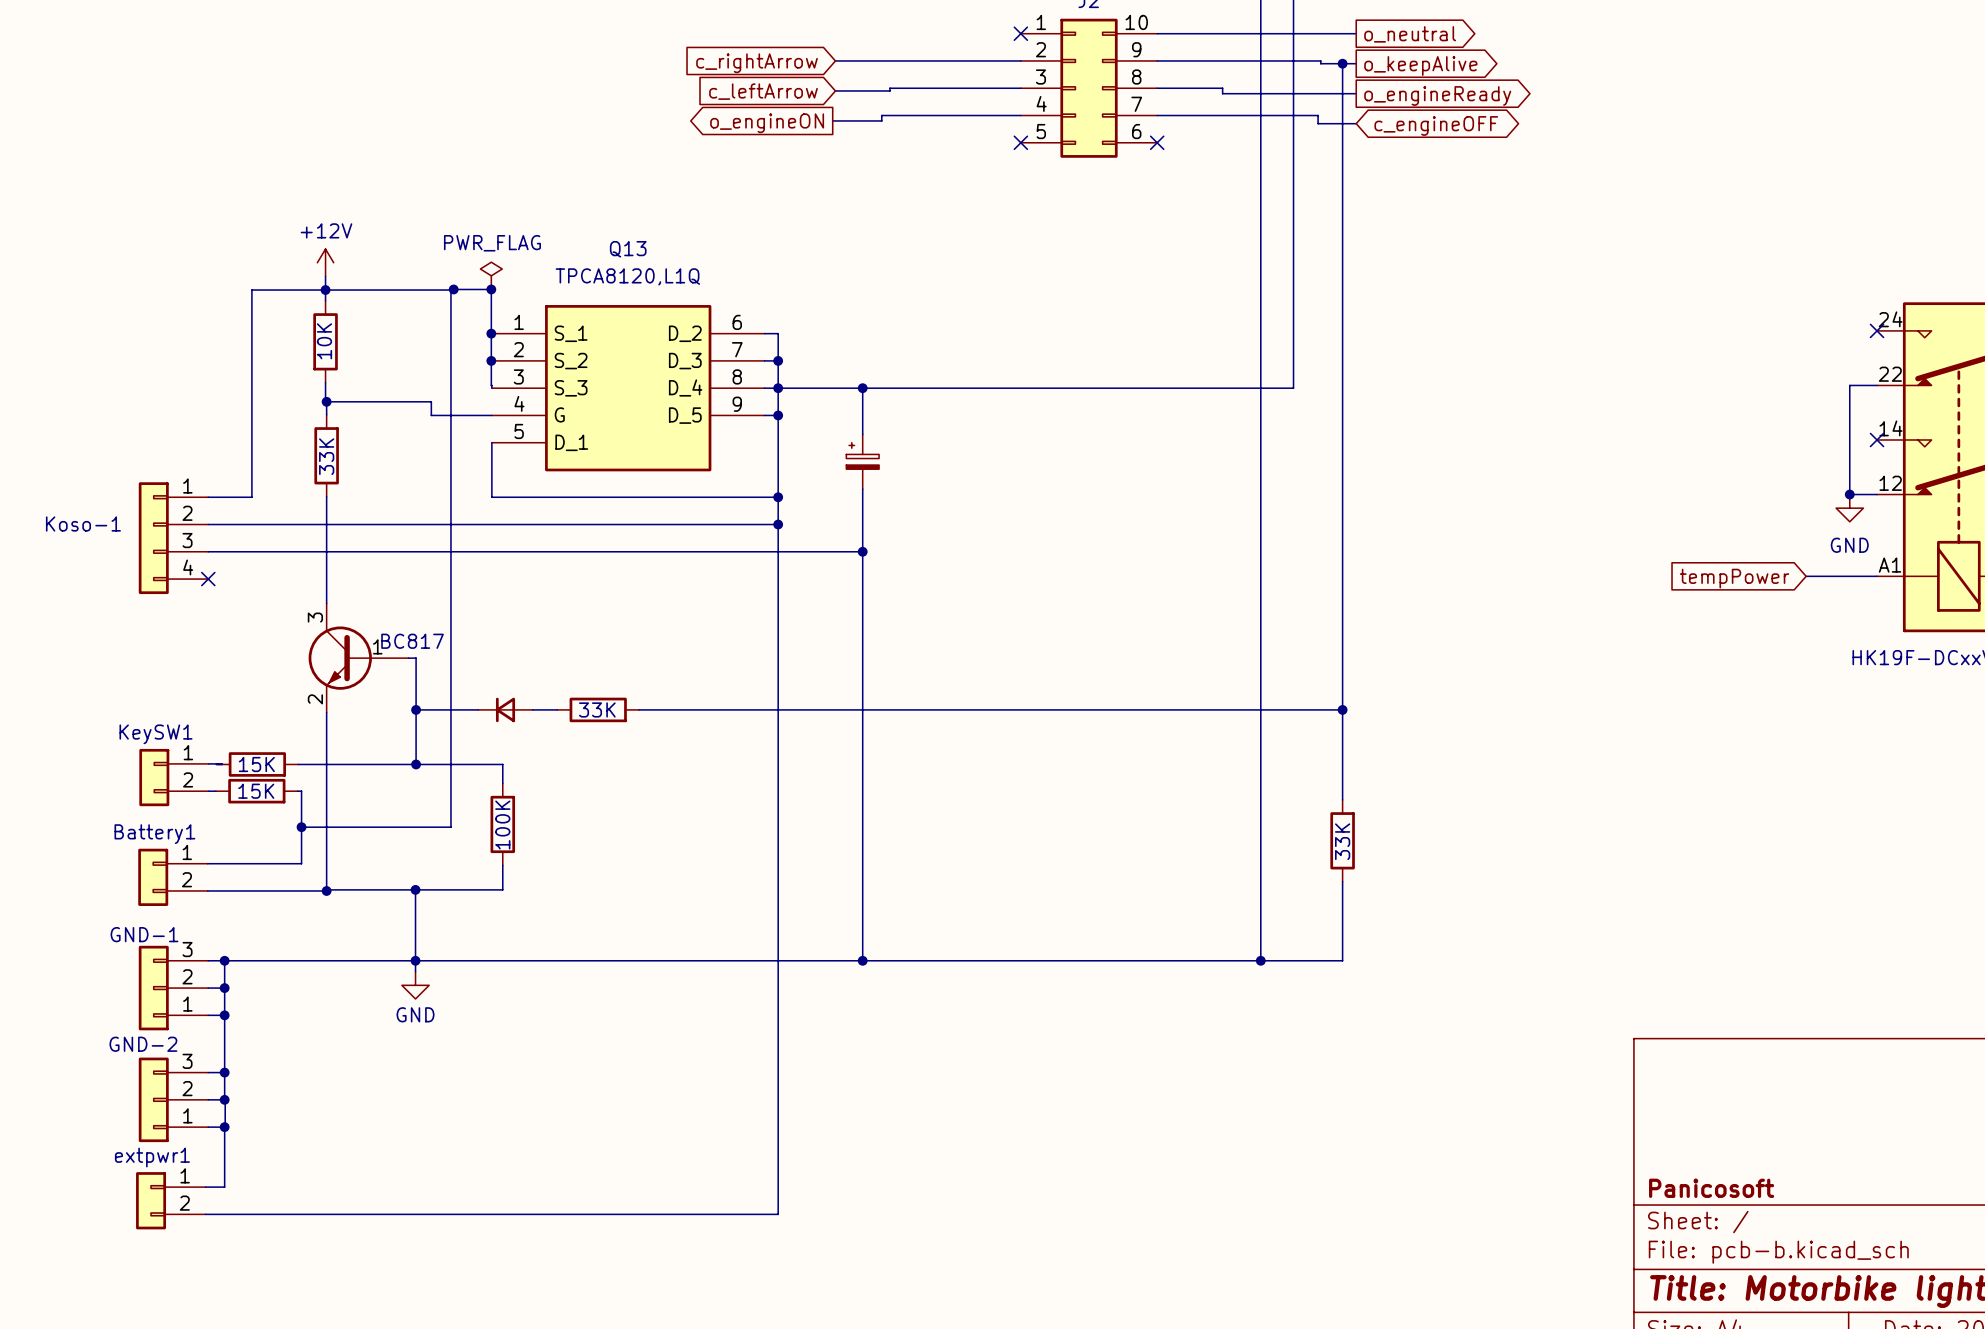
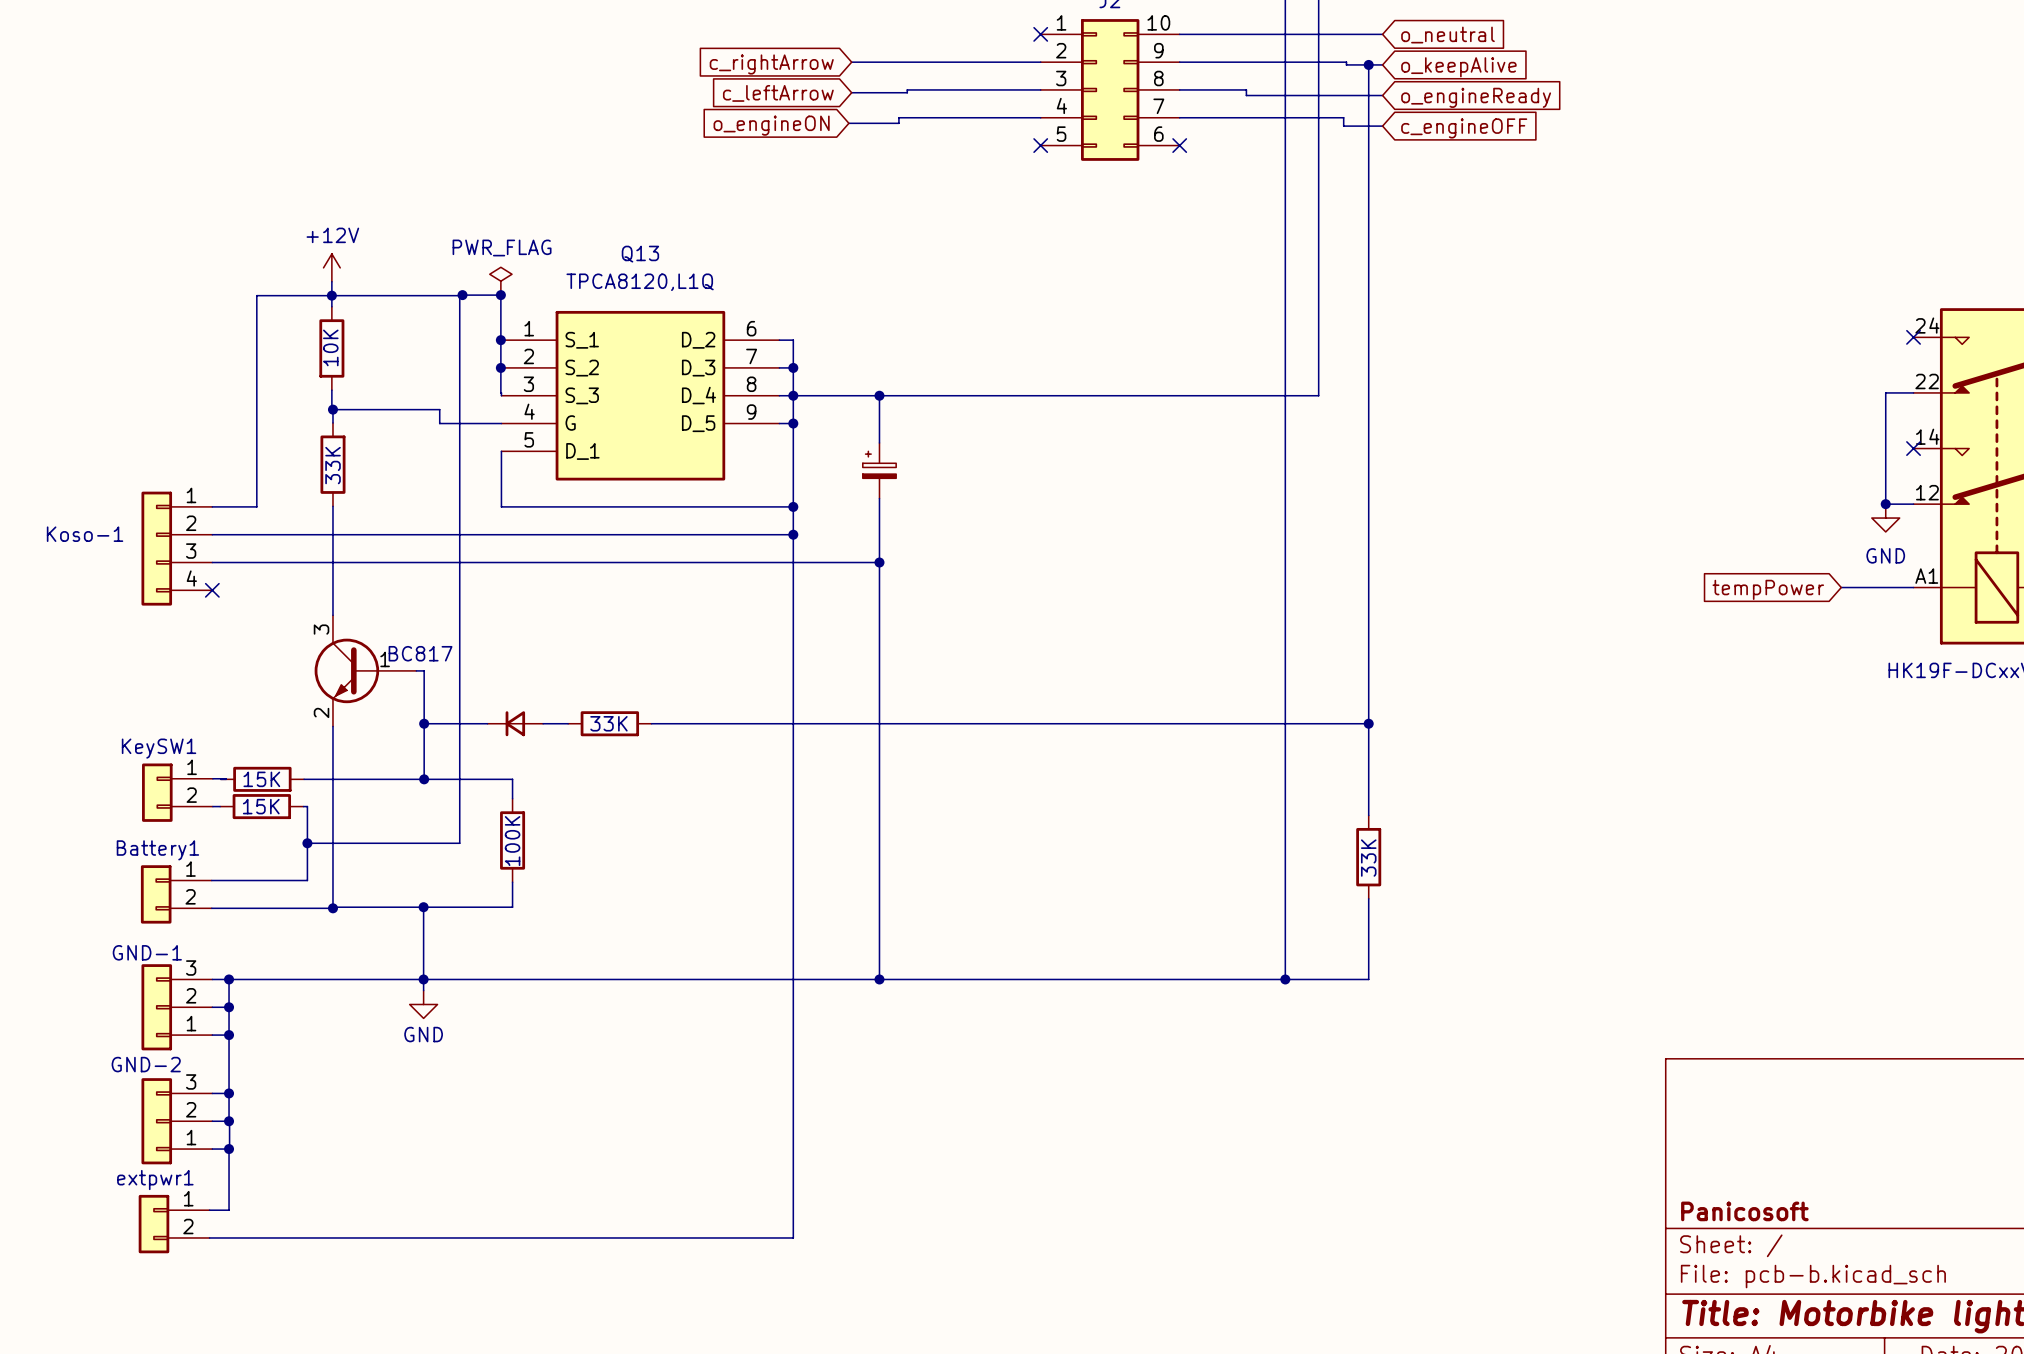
global label shape: output (1410, 34) -> input (1447, 35)
global label shape: output (1420, 65) -> input (1458, 67)
global label shape: output (1437, 95) -> input (1476, 97)
global label shape: output (767, 123) -> input (771, 125)
global label shape: bidirectional (1436, 125) -> input (1464, 128)

